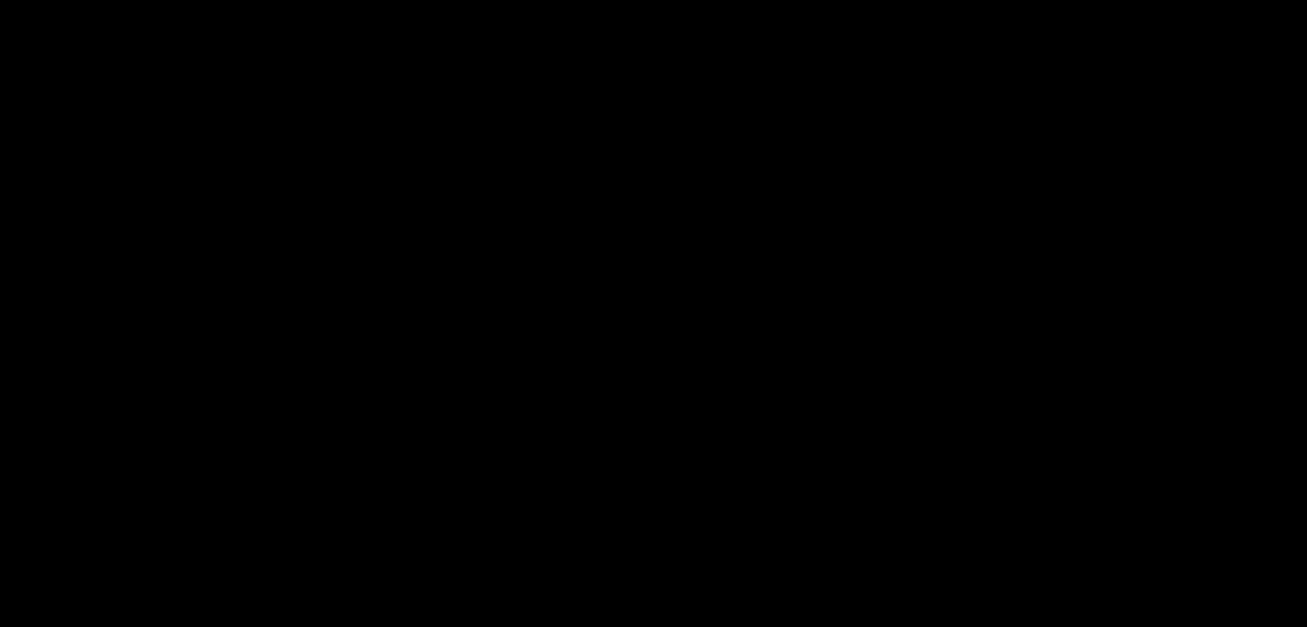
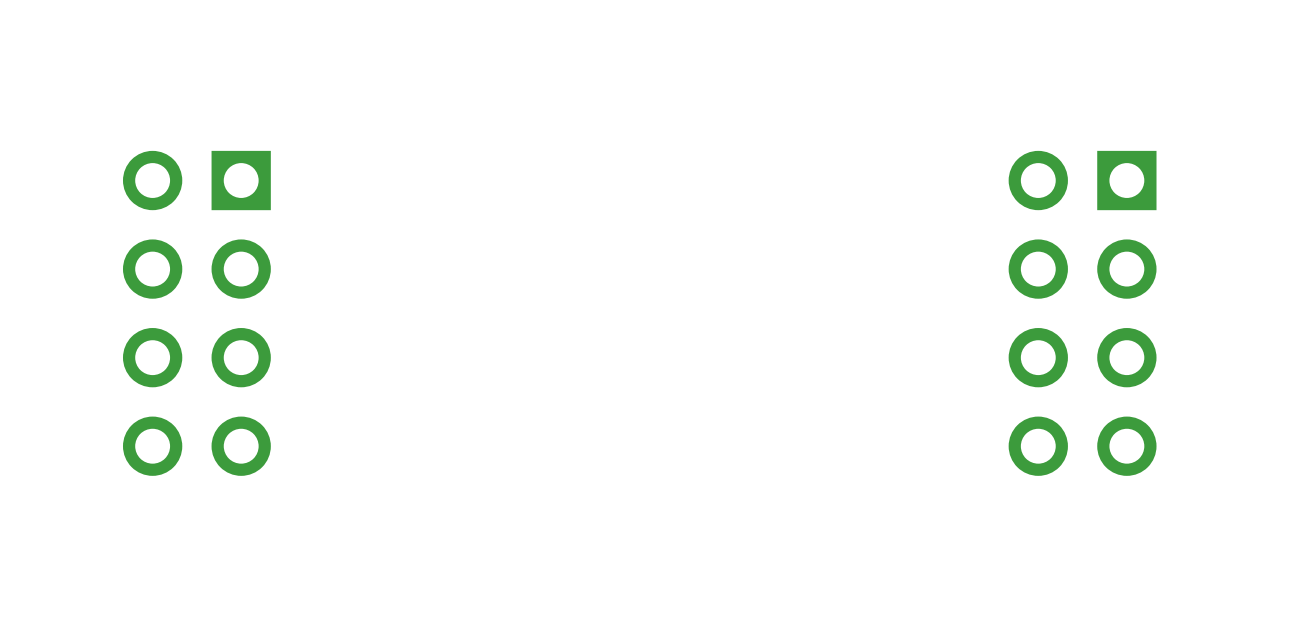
part: none -> (196, 313)
part: none -> (1082, 313)

